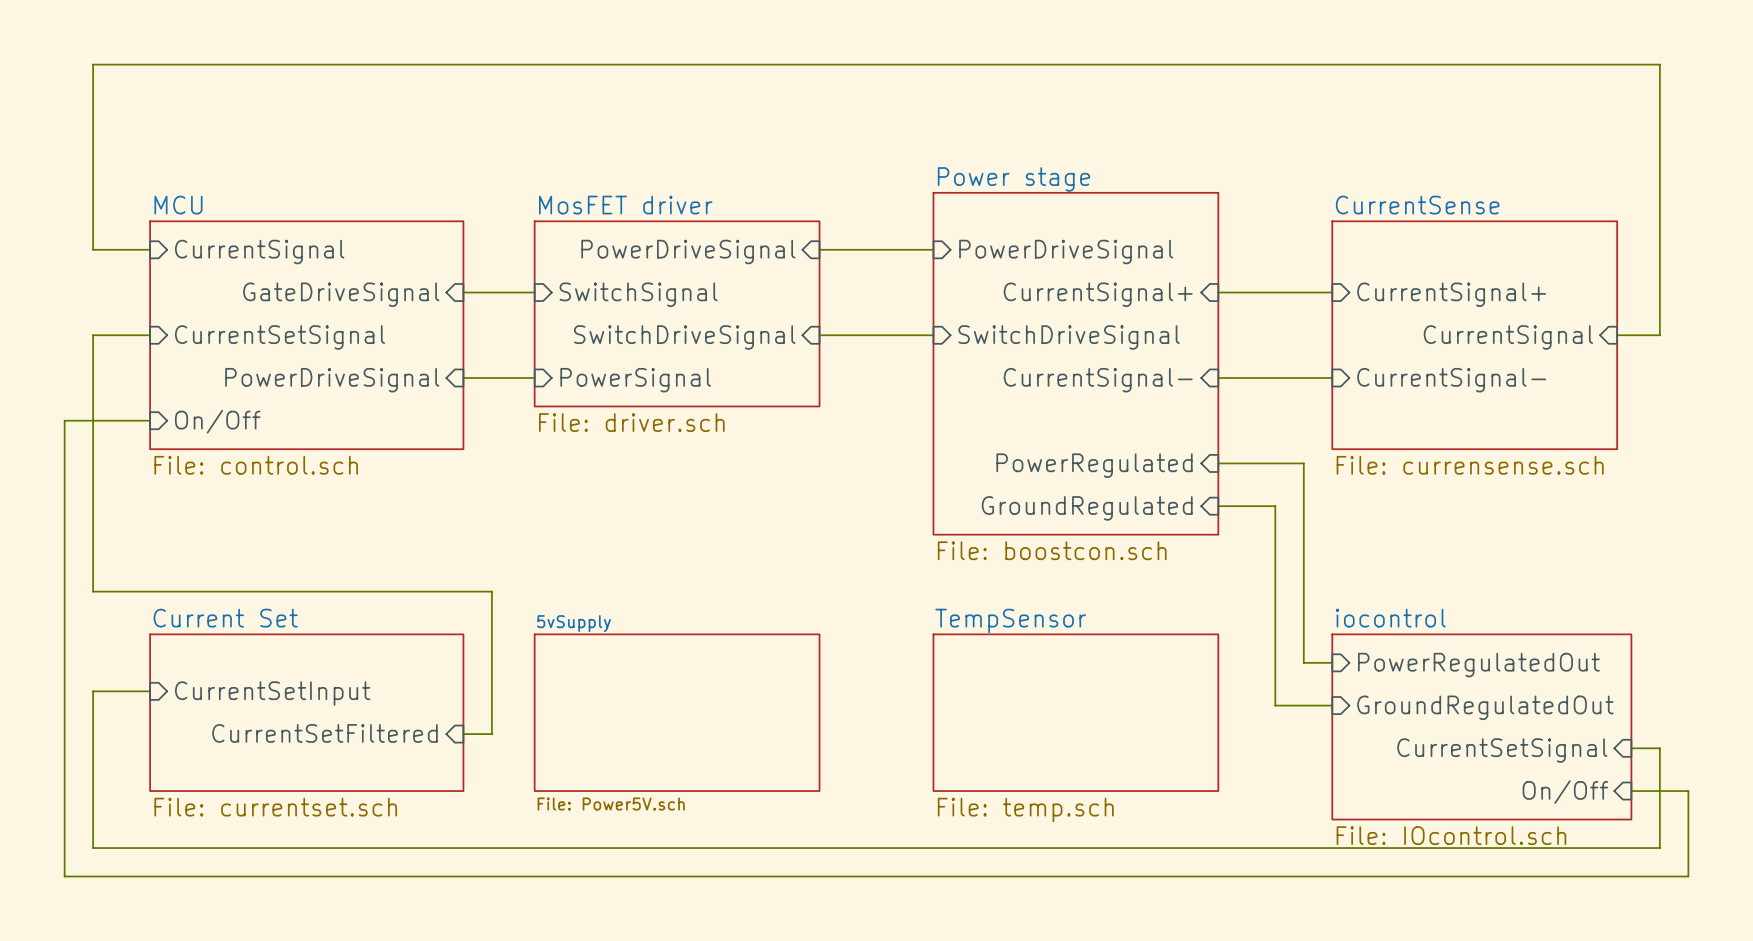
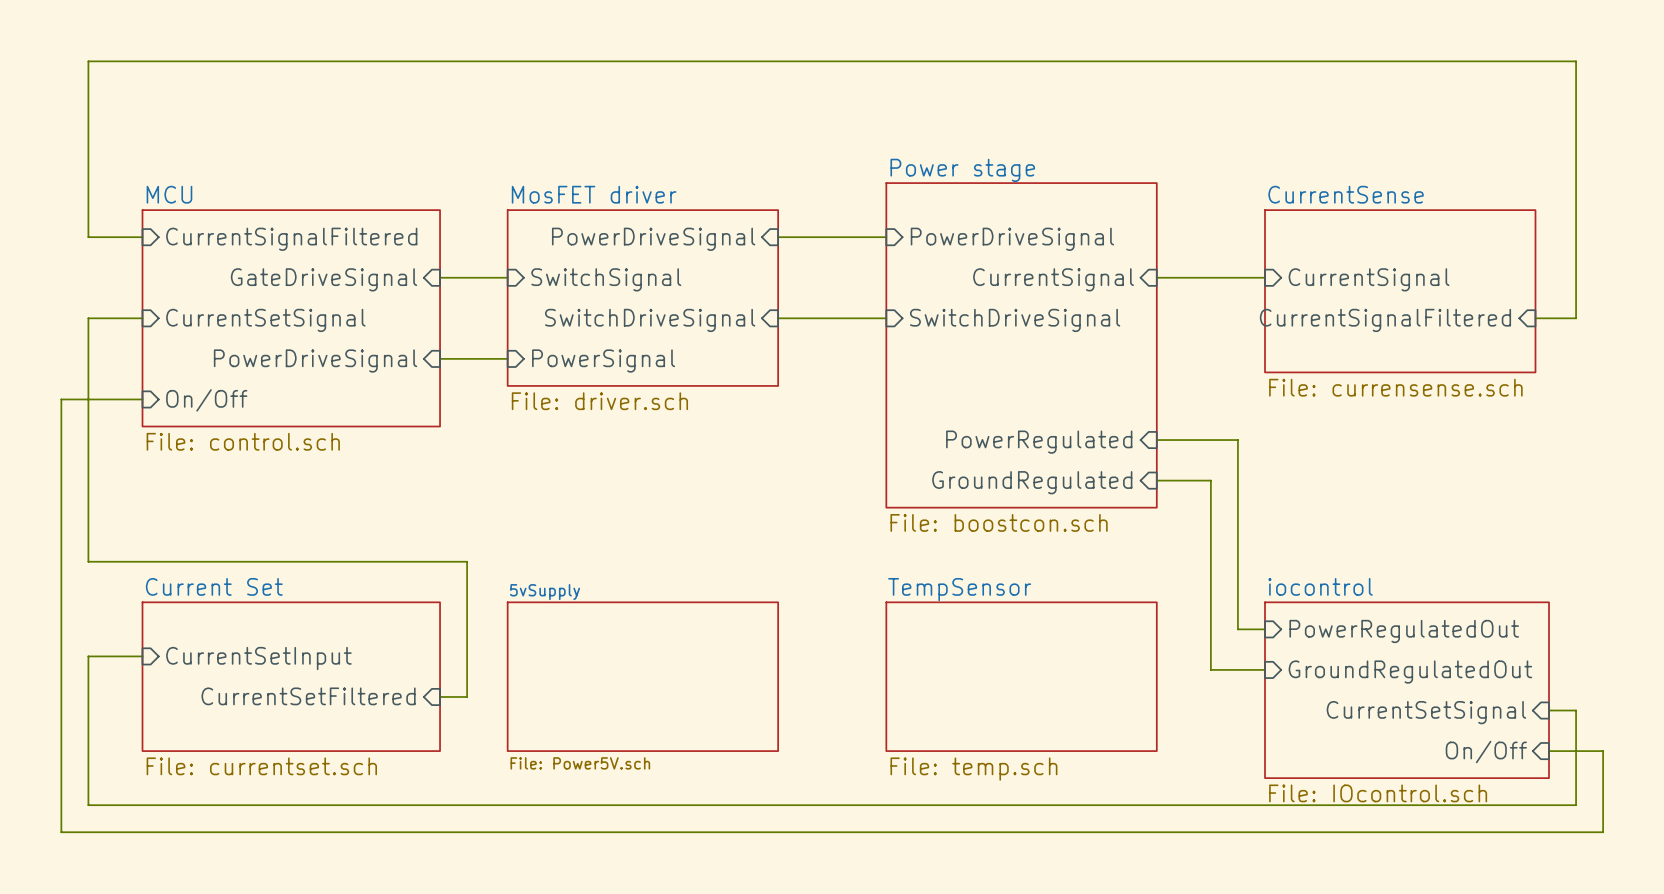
sheet pin: CurrentSignal (259, 252) -> CurrentSignalFiltered (291, 239)
sheet pin: CurrentSignal+ (1098, 294) -> CurrentSignal (1053, 279)
sheet pin: CurrentSignal+ (1451, 294) -> CurrentSignal (1369, 279)
sheet CurrentSense: none -> File: currensense.sch (1400, 291)
sheet CurrentSense: File: currensense.sch (1474, 335) -> none
sheet pin: CurrentSignal (1508, 337) -> CurrentSignalFiltered (1385, 320)
wire: (1218, 377) (1332, 377) -> none
sheet pin: CurrentSignal- (1098, 380) -> none
sheet pin: CurrentSignal- (1451, 380) -> none

